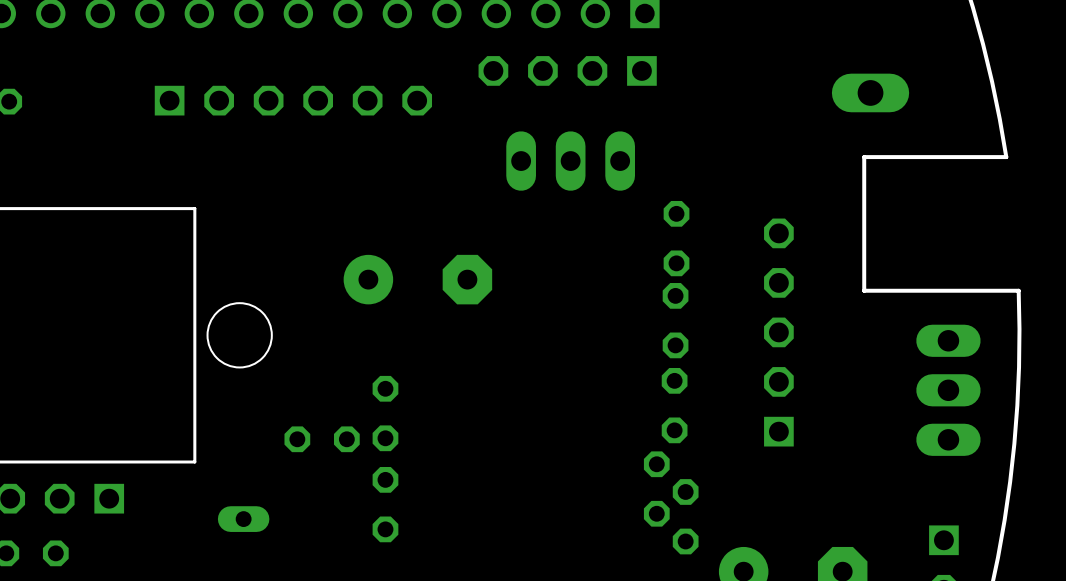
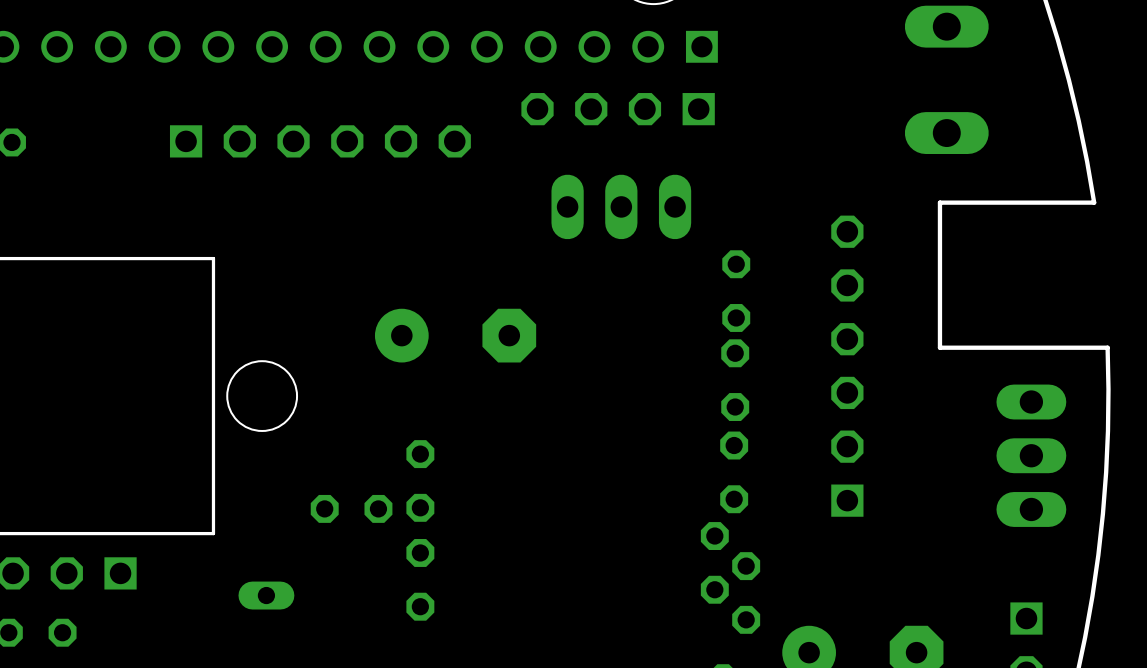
part: none -> (847, 366)

